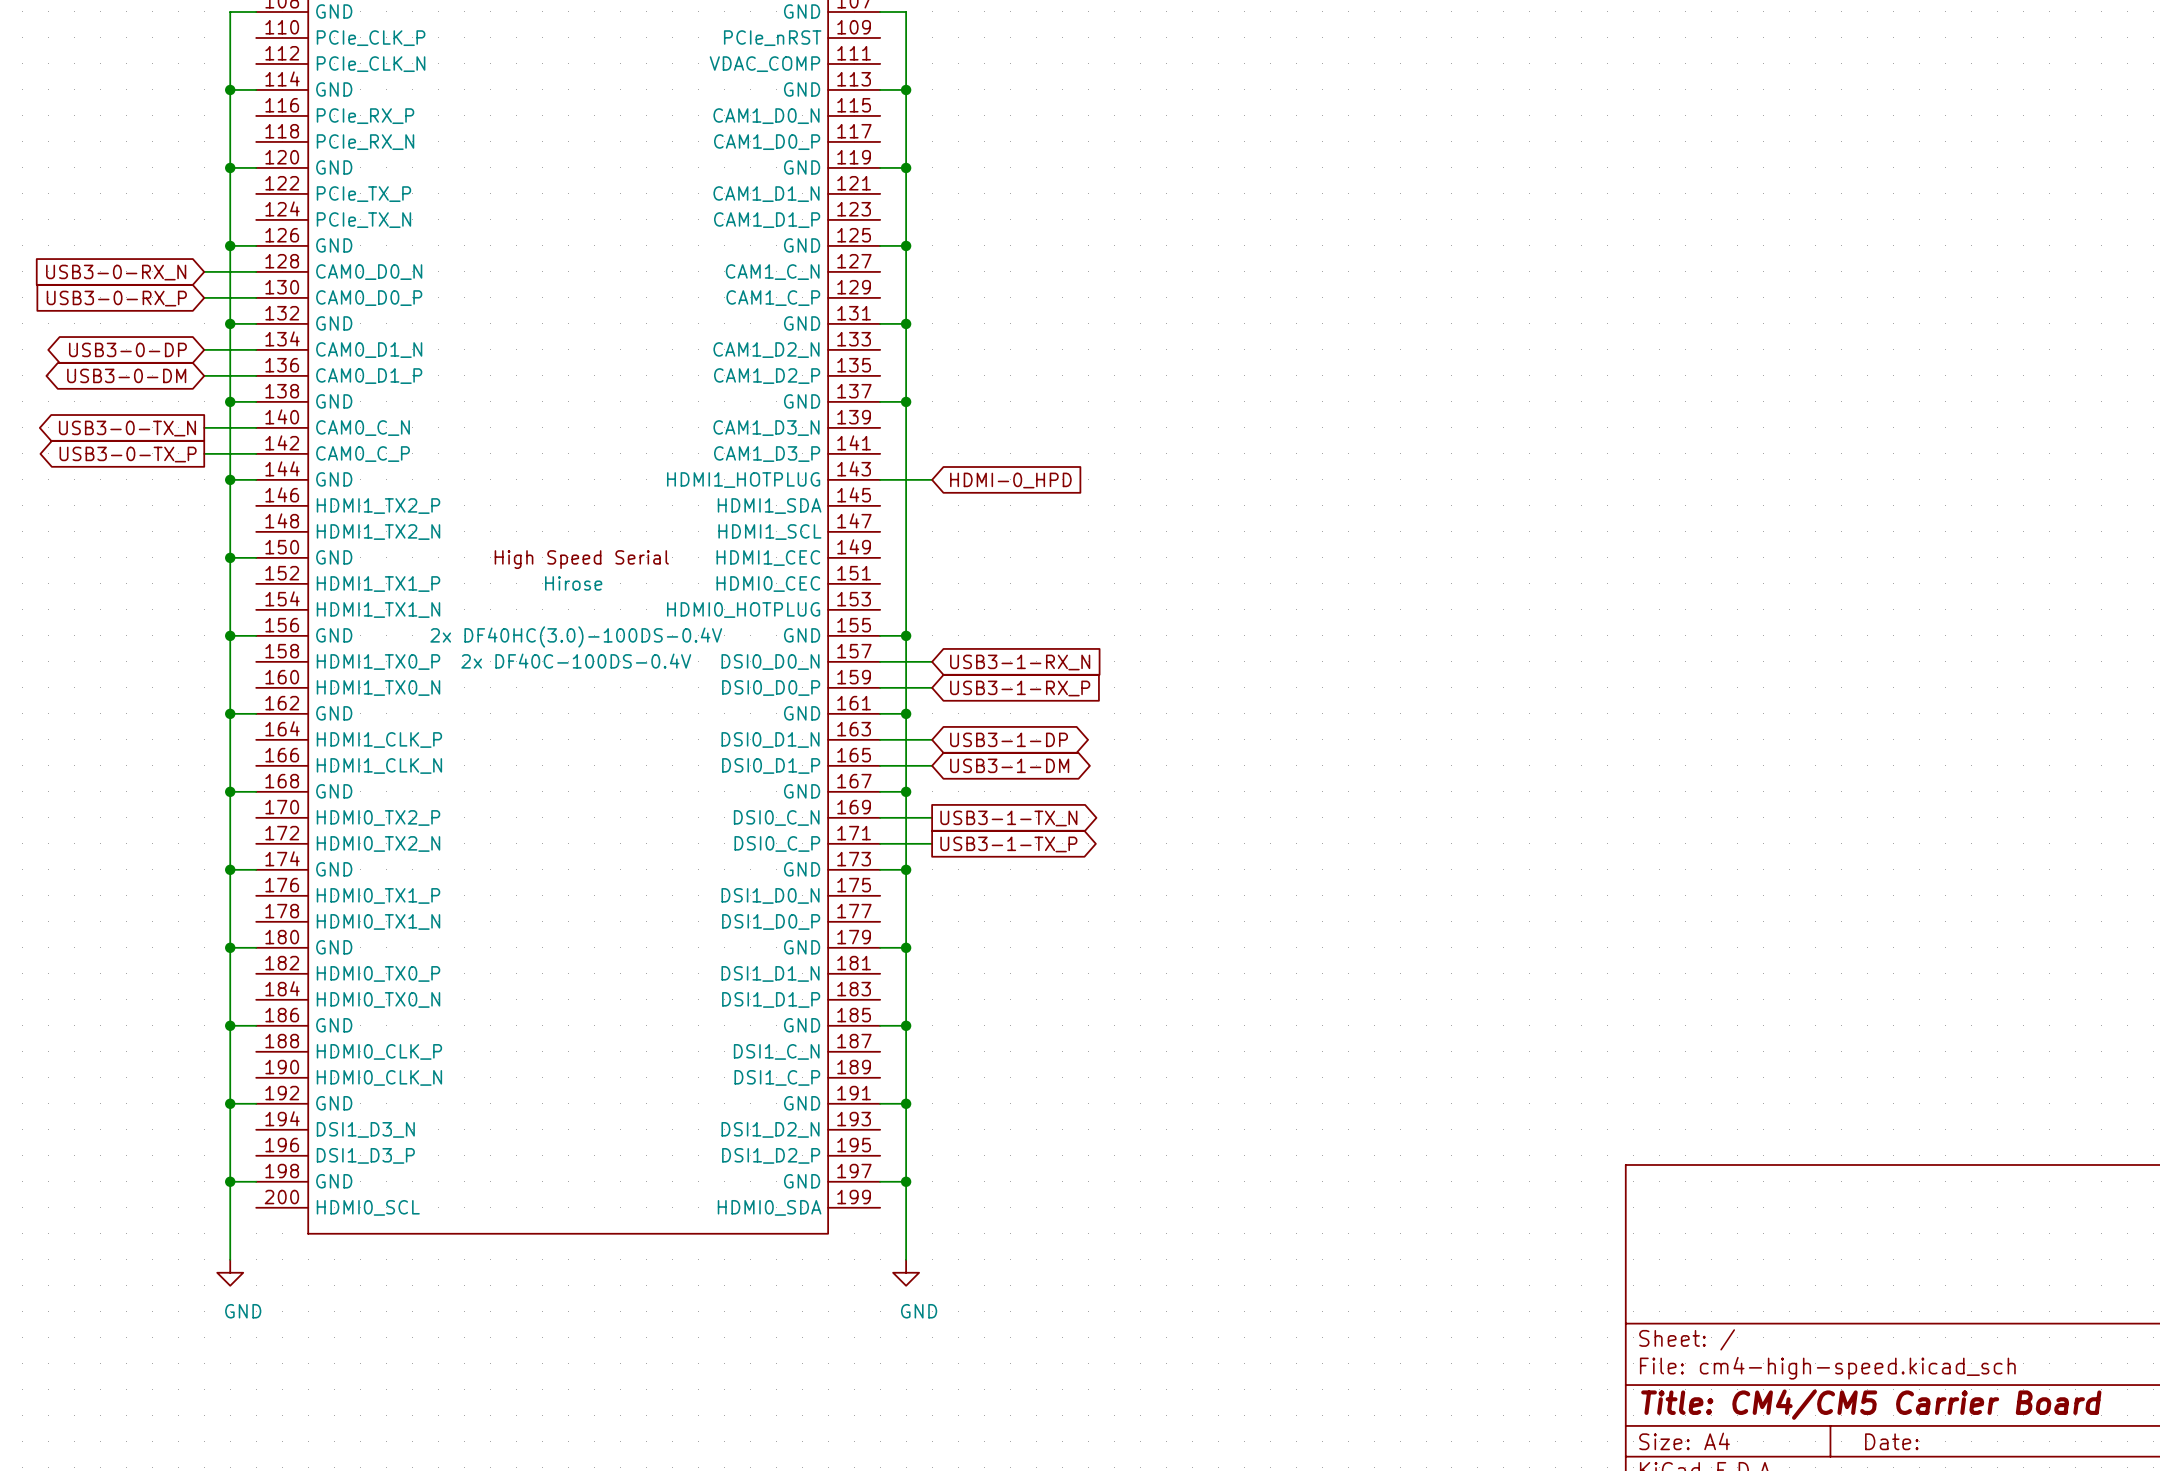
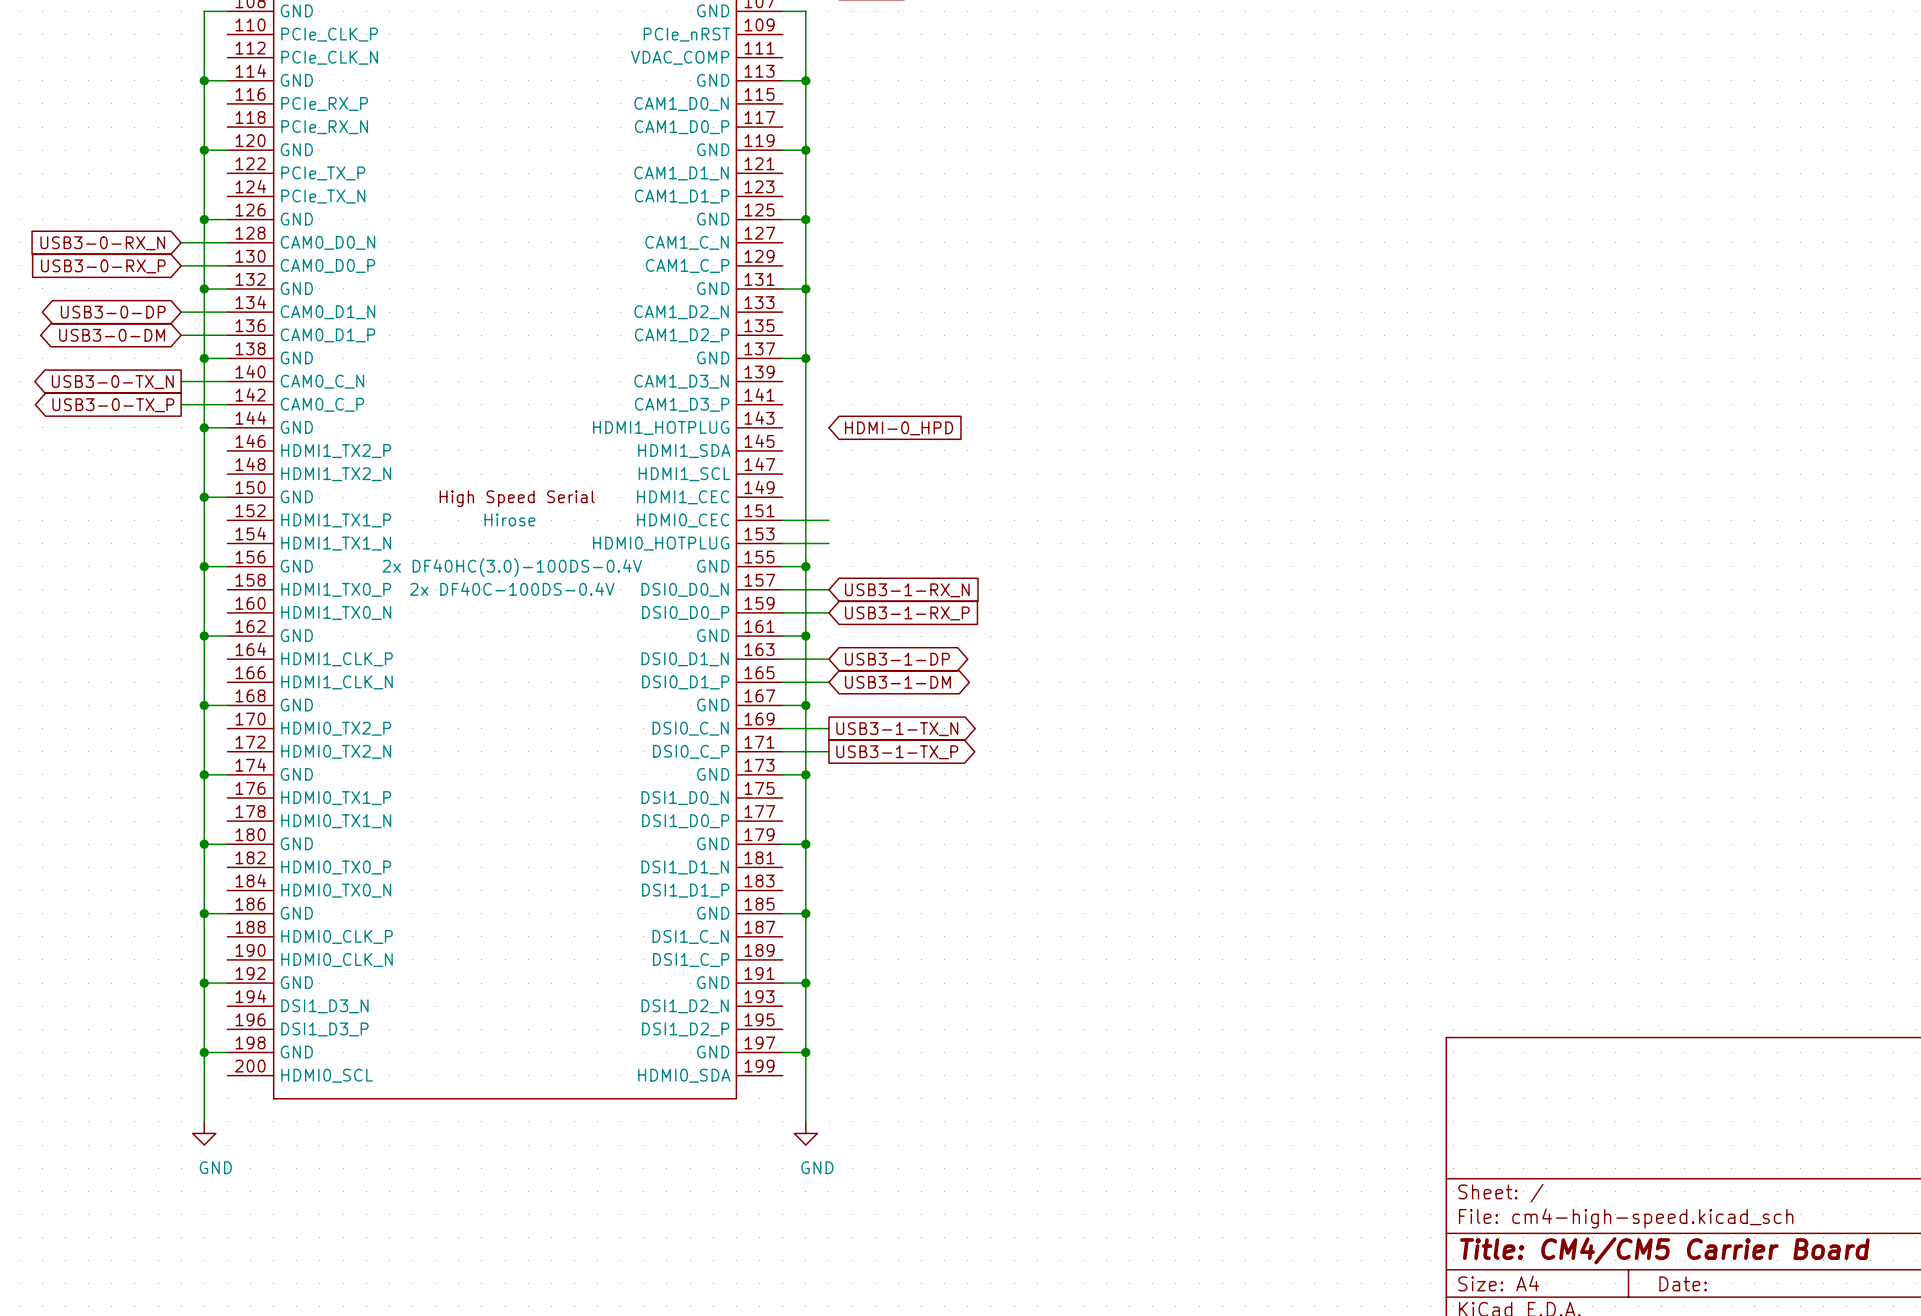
wire: (880, 479) (932, 479) -> (782, 520) (828, 520)
wire: none -> (782, 543) (828, 543)

